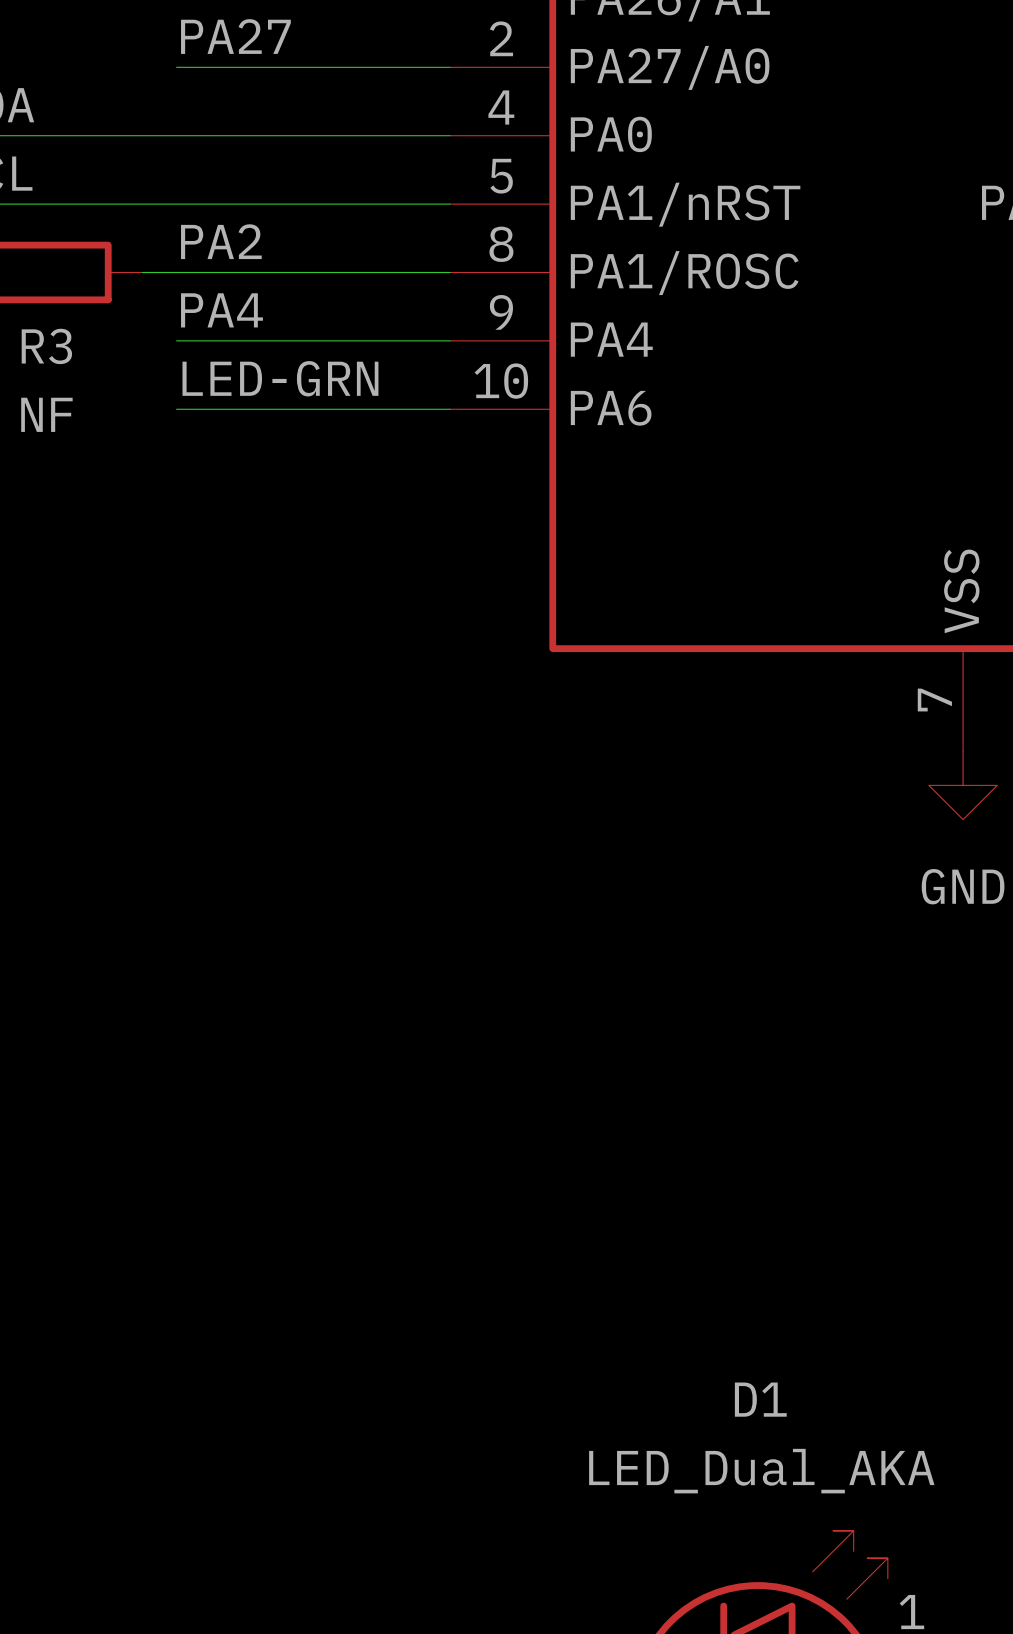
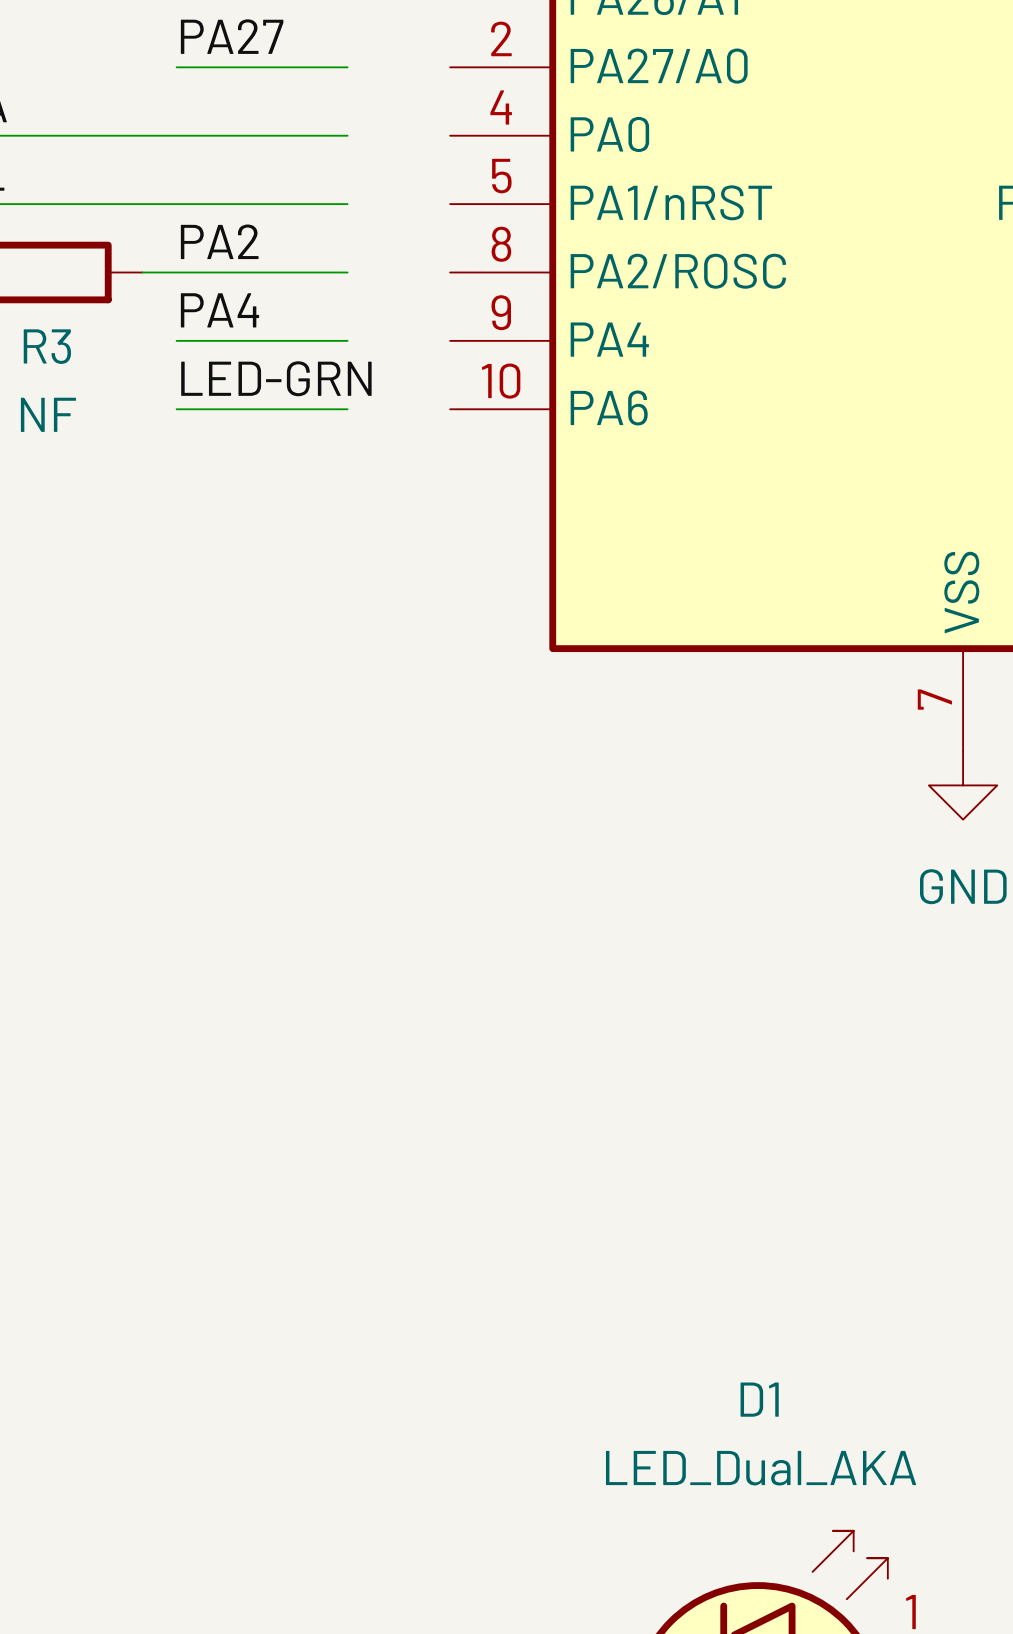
wire: (347, 67) (450, 67) -> none
wire: (347, 135) (450, 135) -> none
wire: (347, 204) (450, 204) -> none
wire: (347, 272) (450, 272) -> none
part pin name: PA1/ROSC (684, 273) -> PA2/ROSC (678, 271)
wire: (347, 340) (450, 340) -> none
wire: (347, 409) (450, 409) -> none

